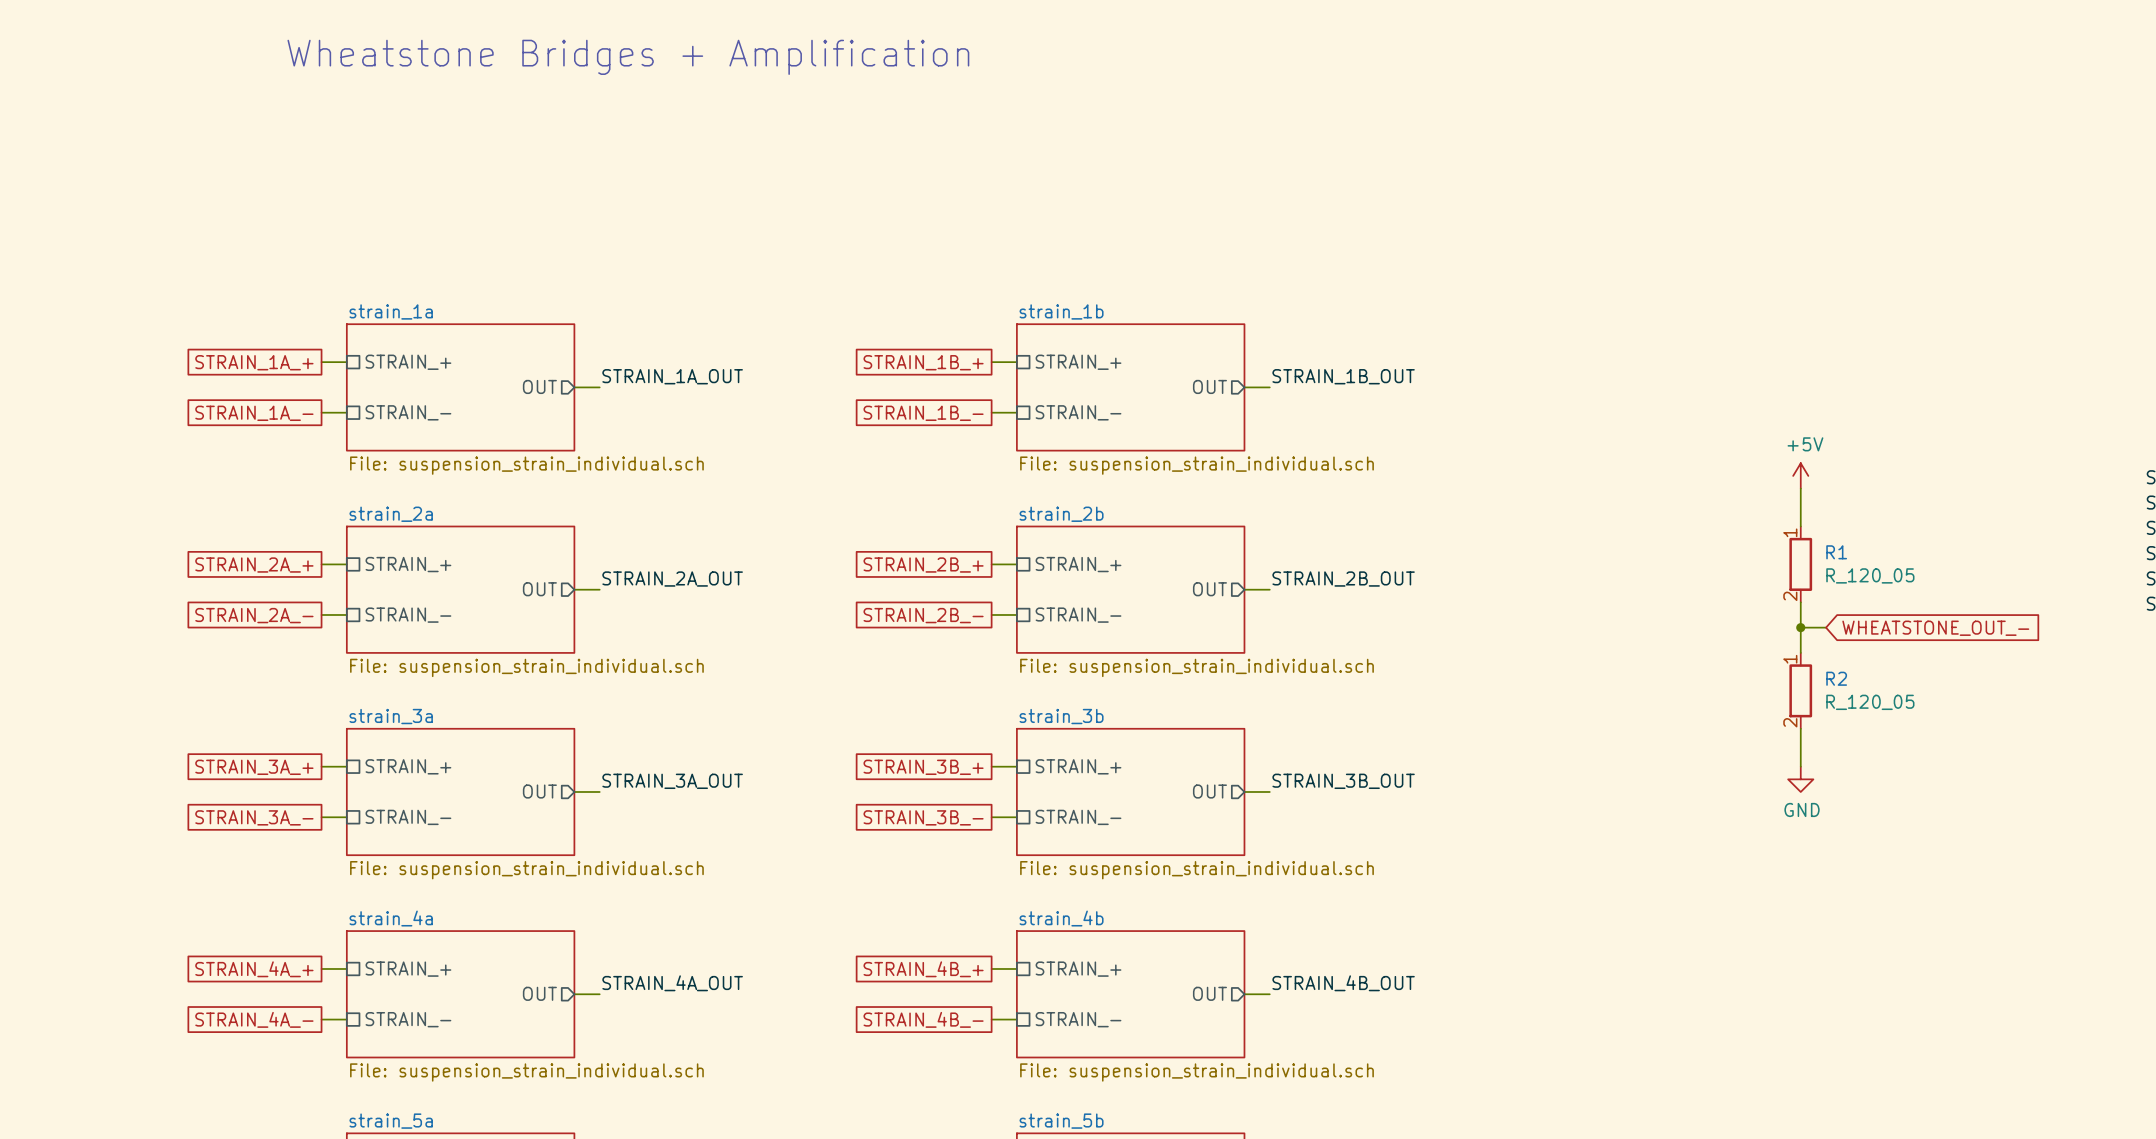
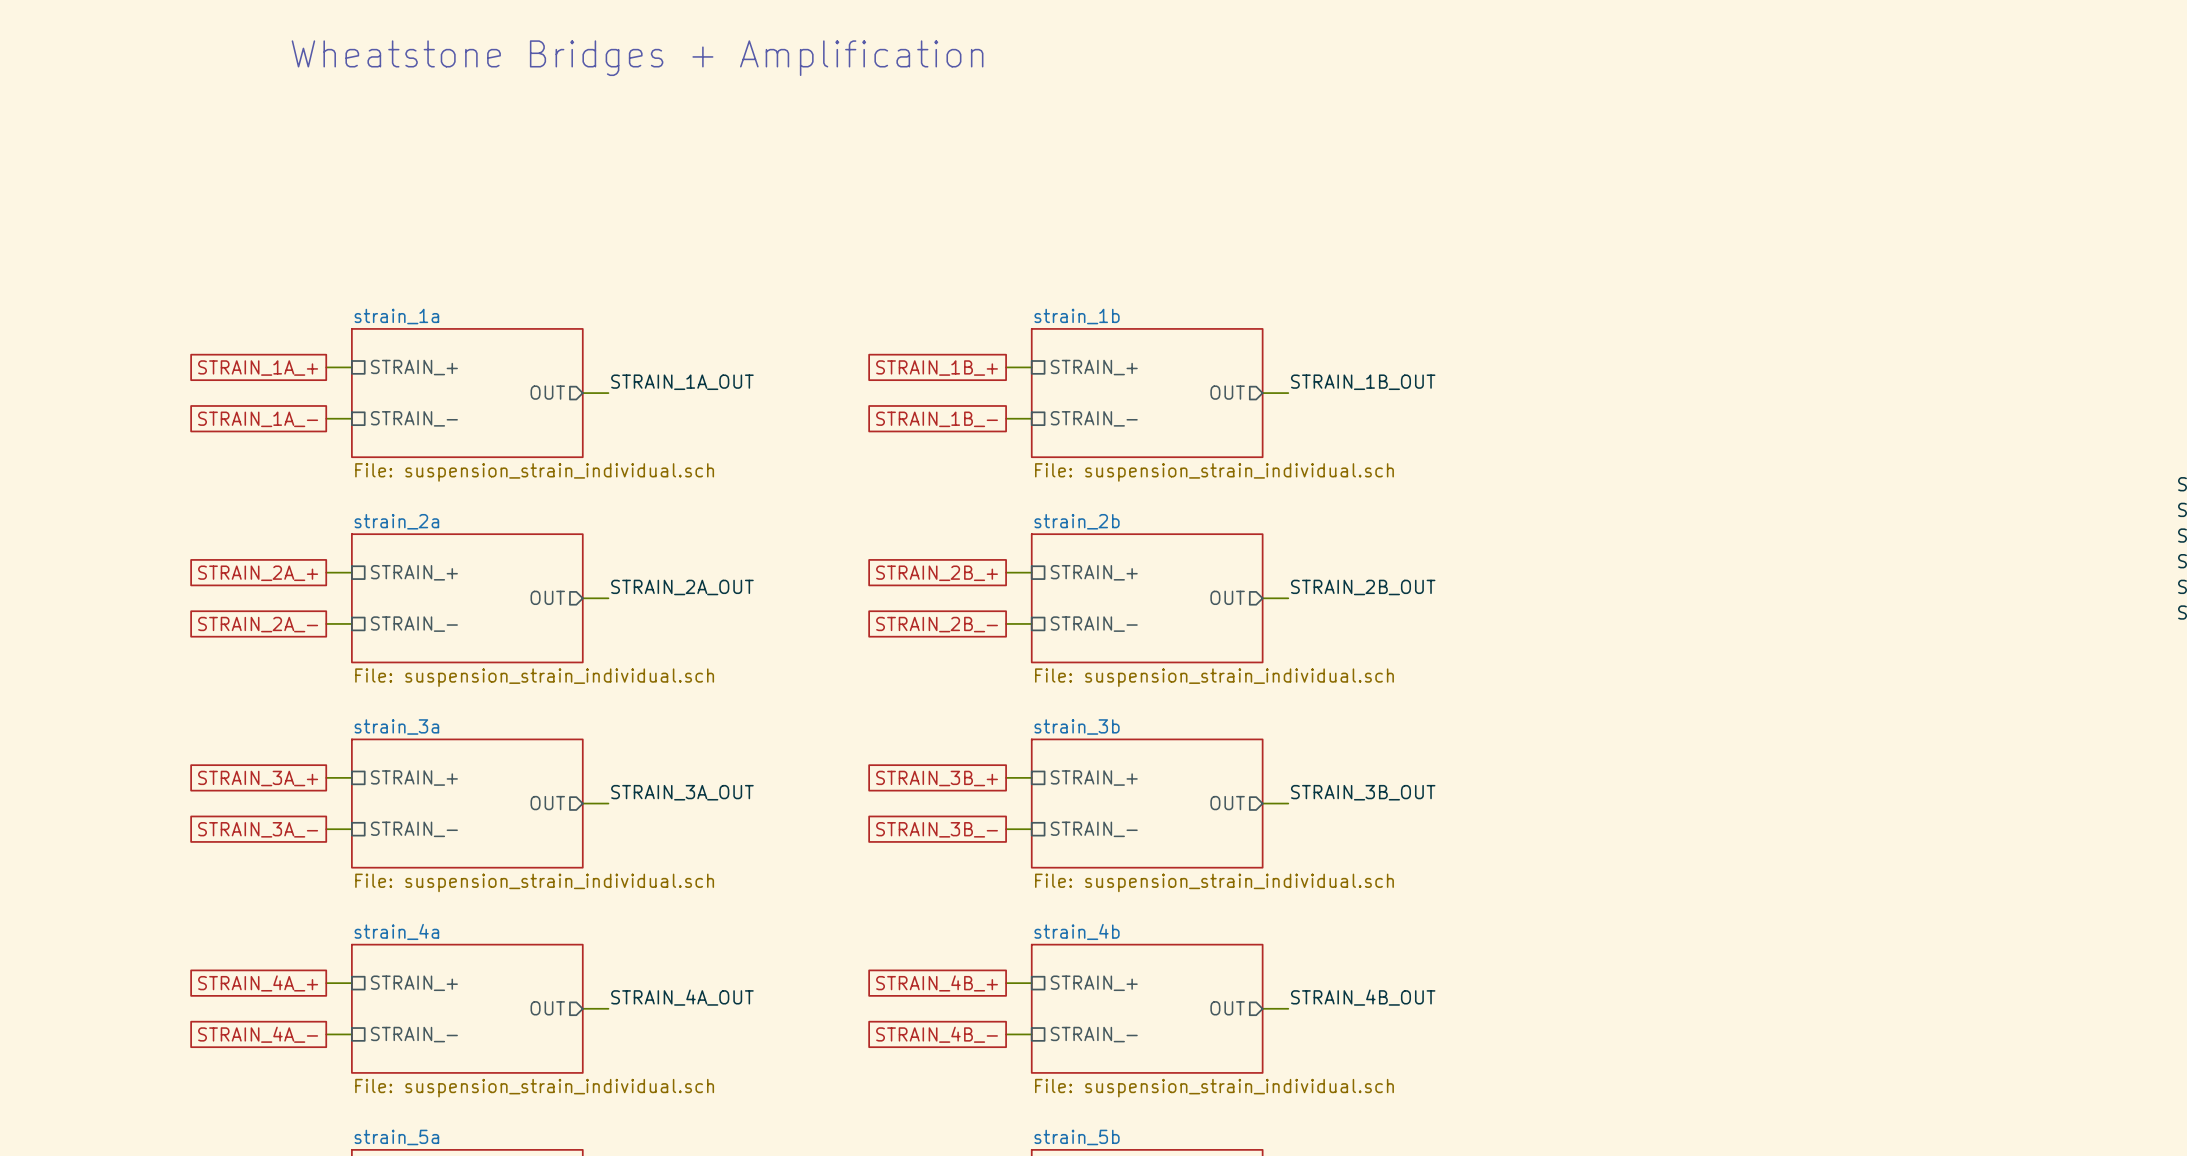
power symbol: +5V (1800, 475) -> none
wire: (1800, 488) (1800, 526) -> none
R1: R_120_05 (1800, 564) -> none
wire: (1800, 602) (1800, 652) -> none
wire: (1800, 627) (1826, 627) -> none
junction: (1800, 627) -> none
global label: WHEATSTONE_OUT_- (1935, 628) -> none
R2: R_120_05 (1800, 690) -> none
wire: (1800, 728) (1800, 766) -> none
power symbol: GND (1800, 779) -> none

